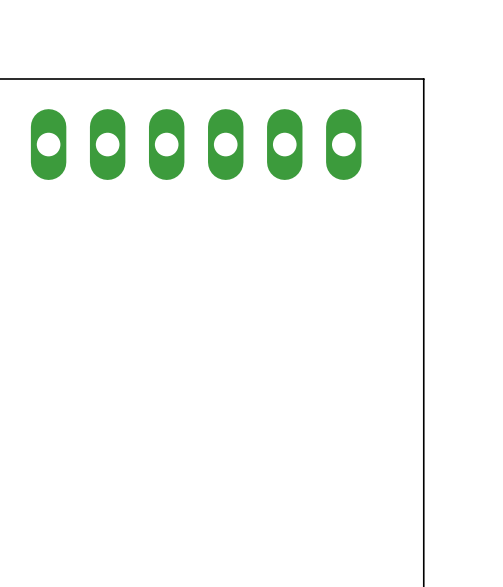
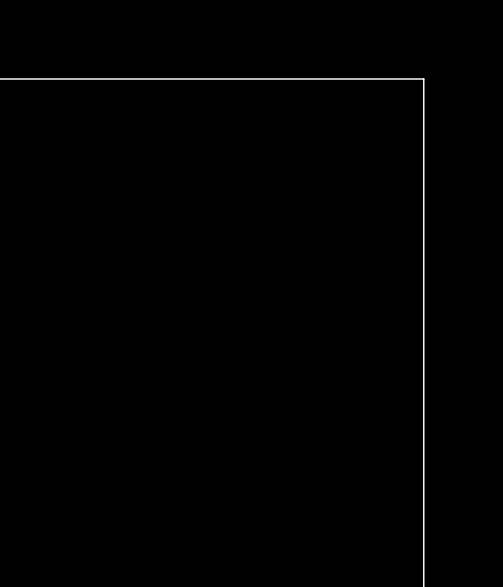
part: (196, 144) -> none

